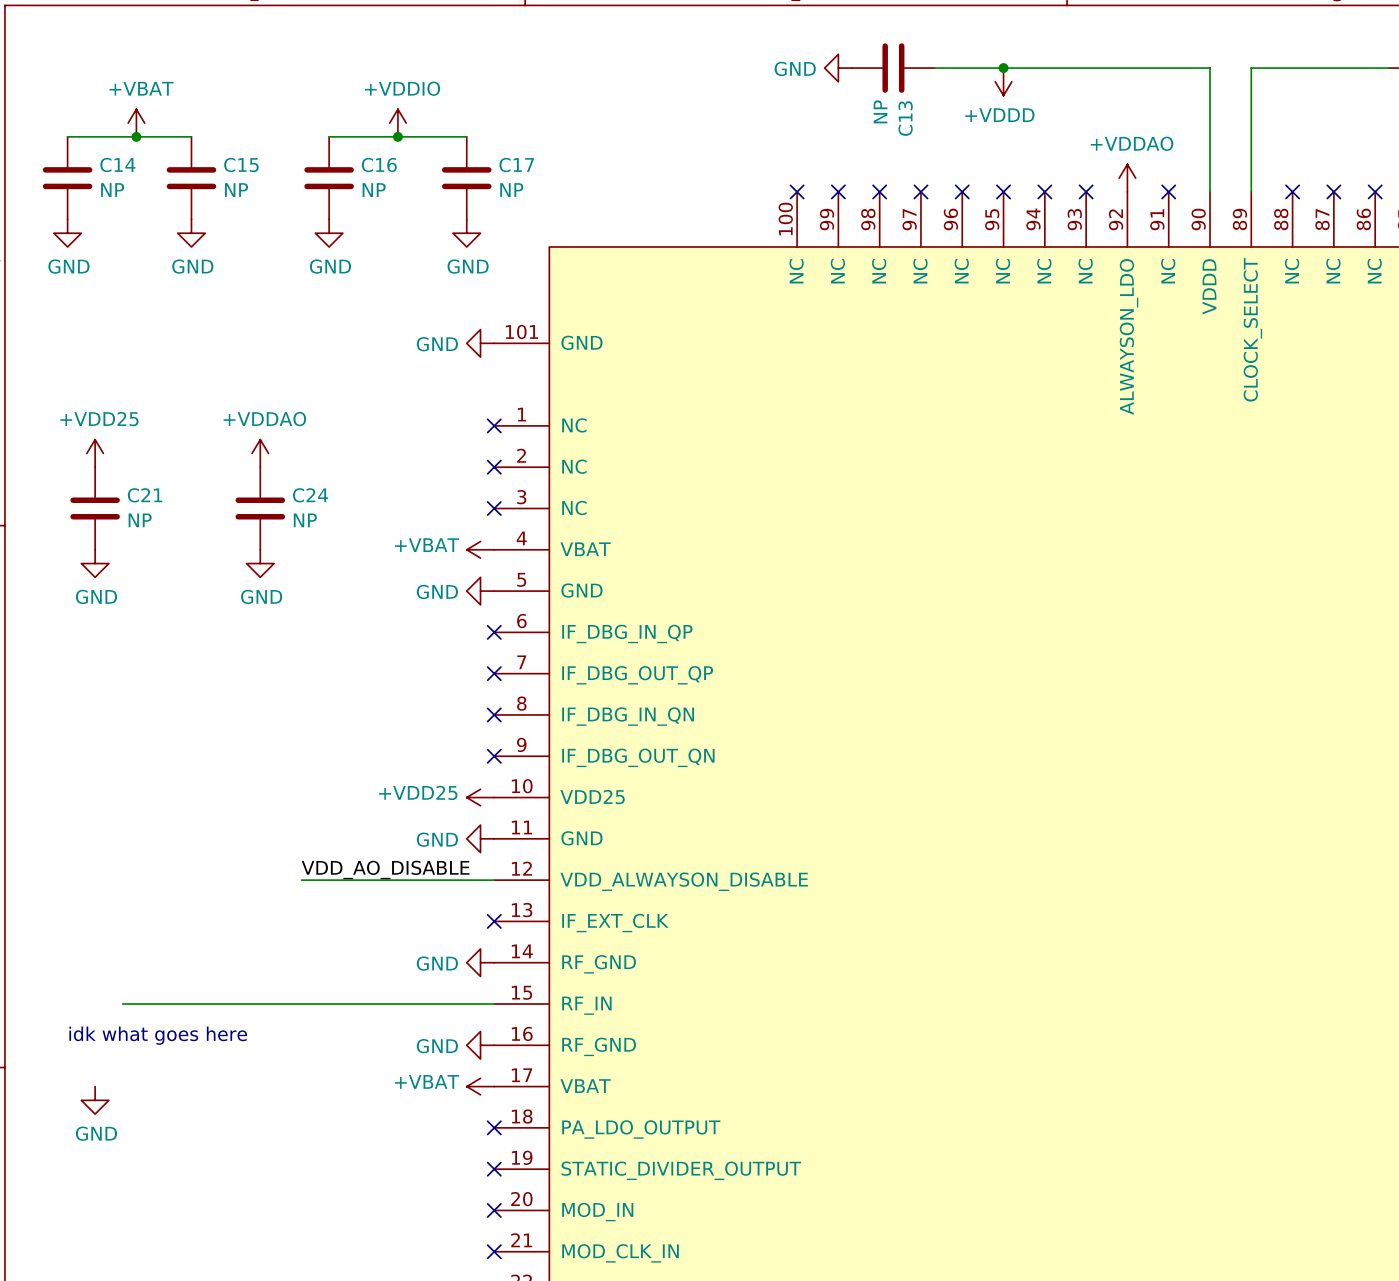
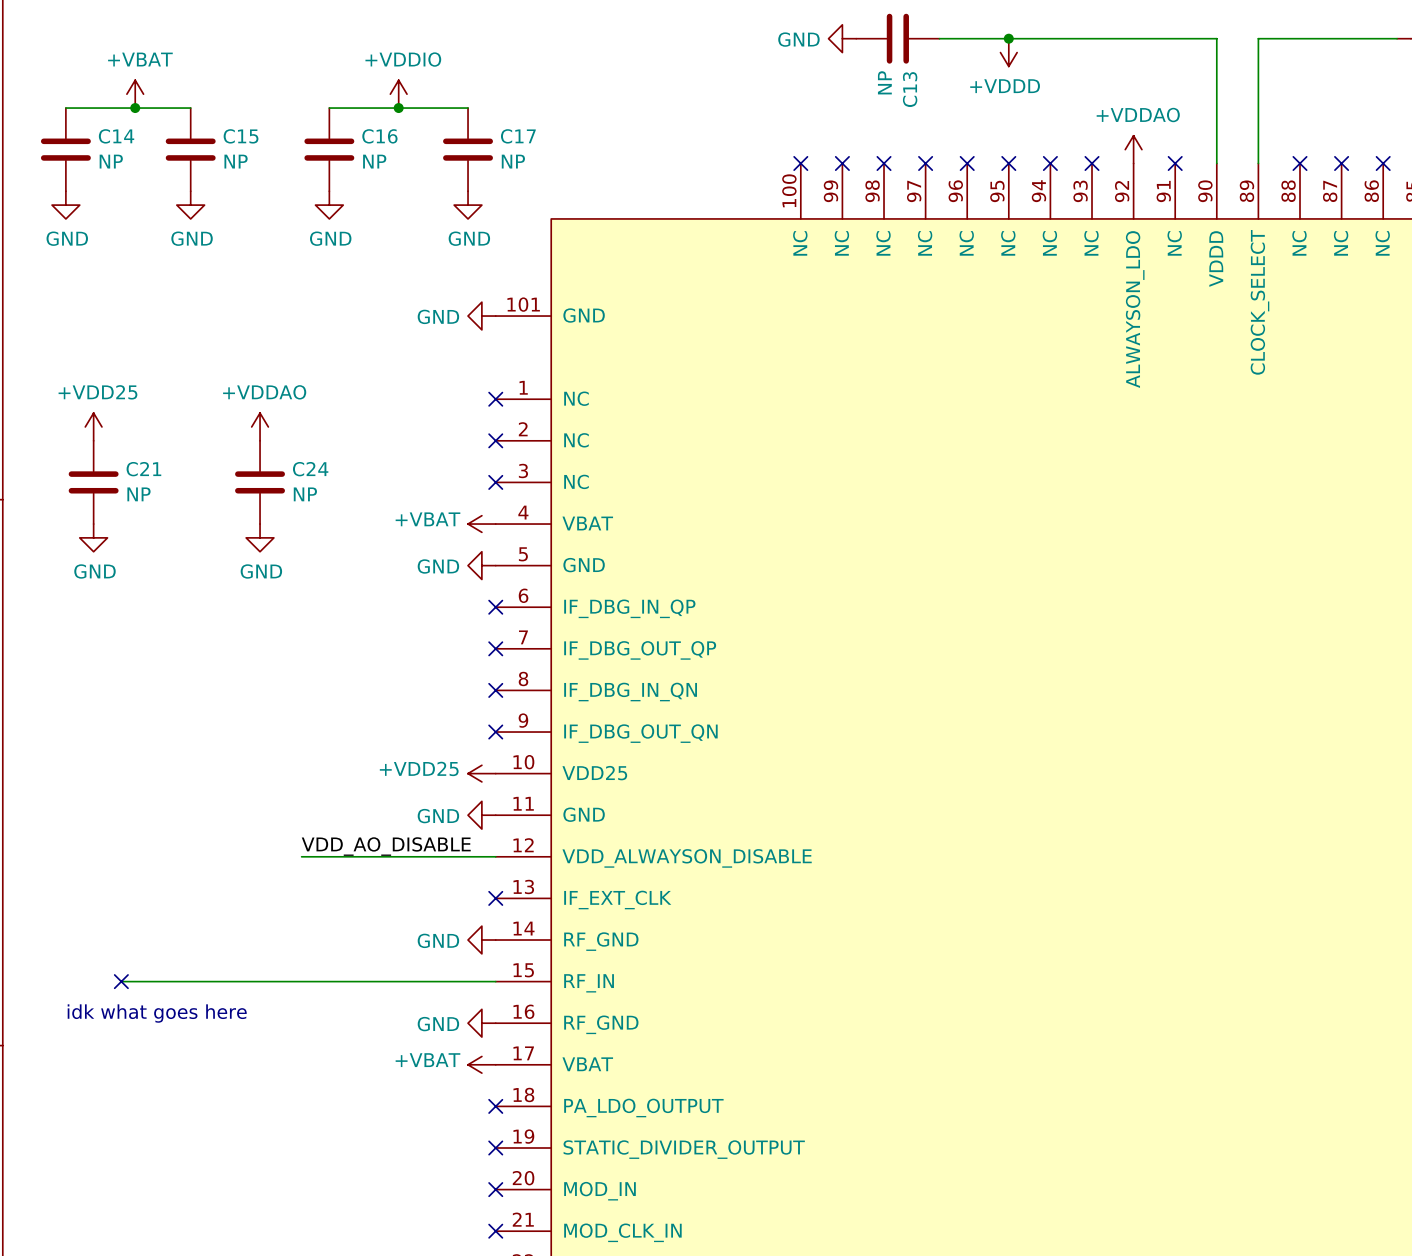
no-connect mark: none -> (121, 981)
power symbol: GND (95, 1100) -> none

